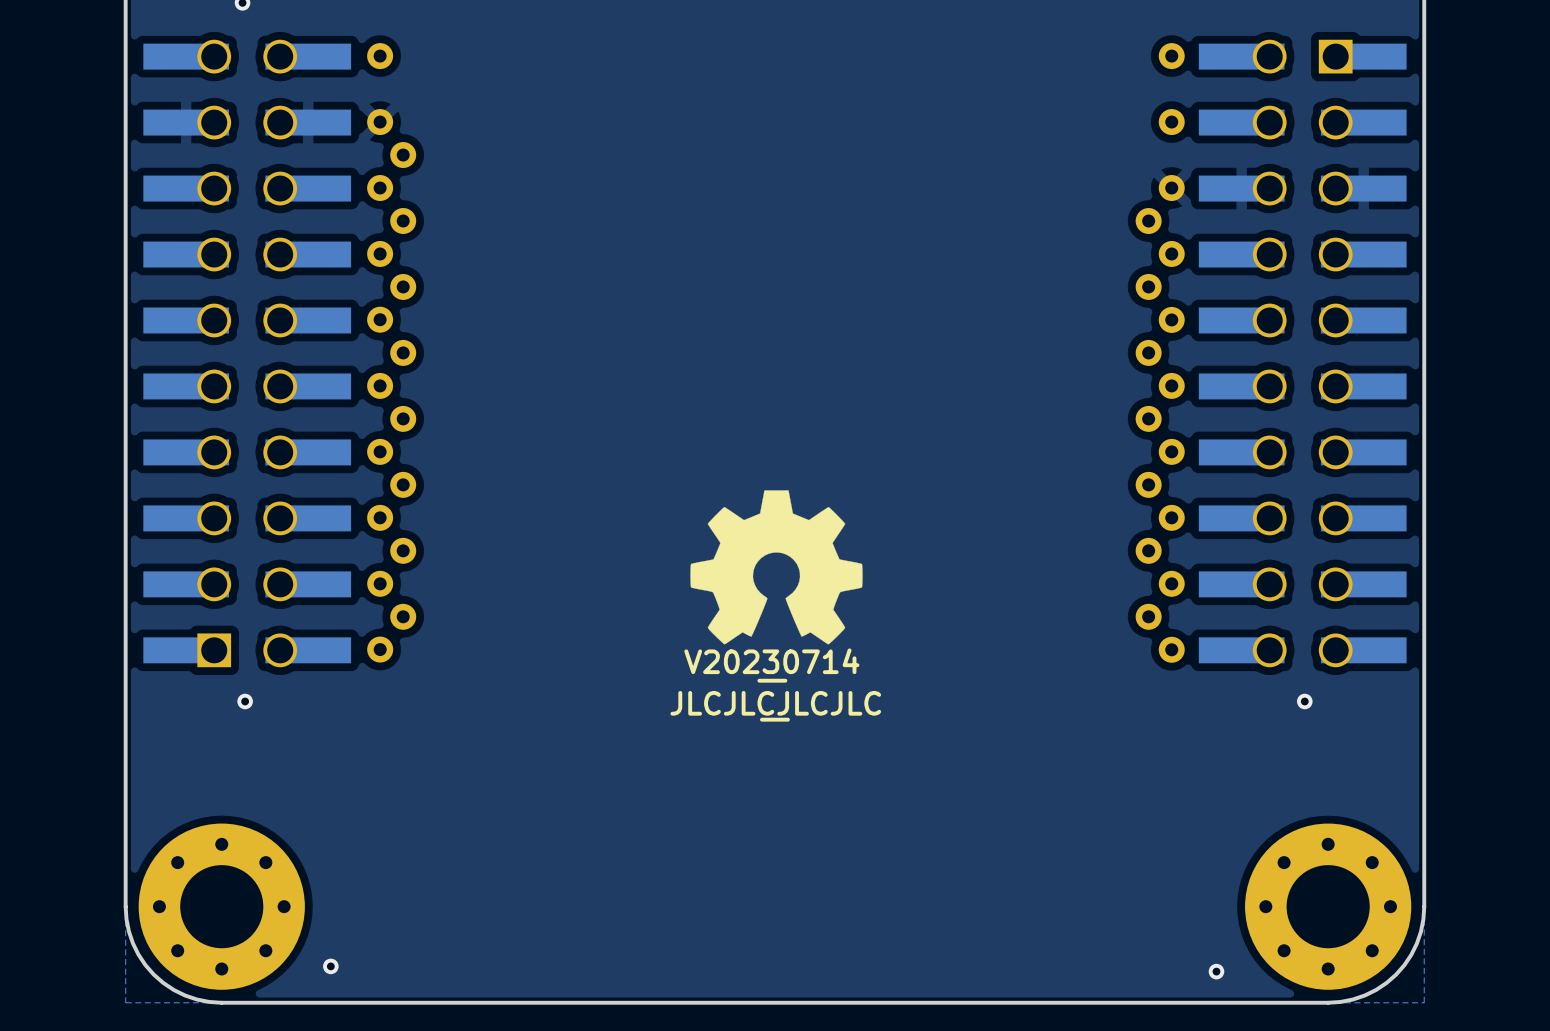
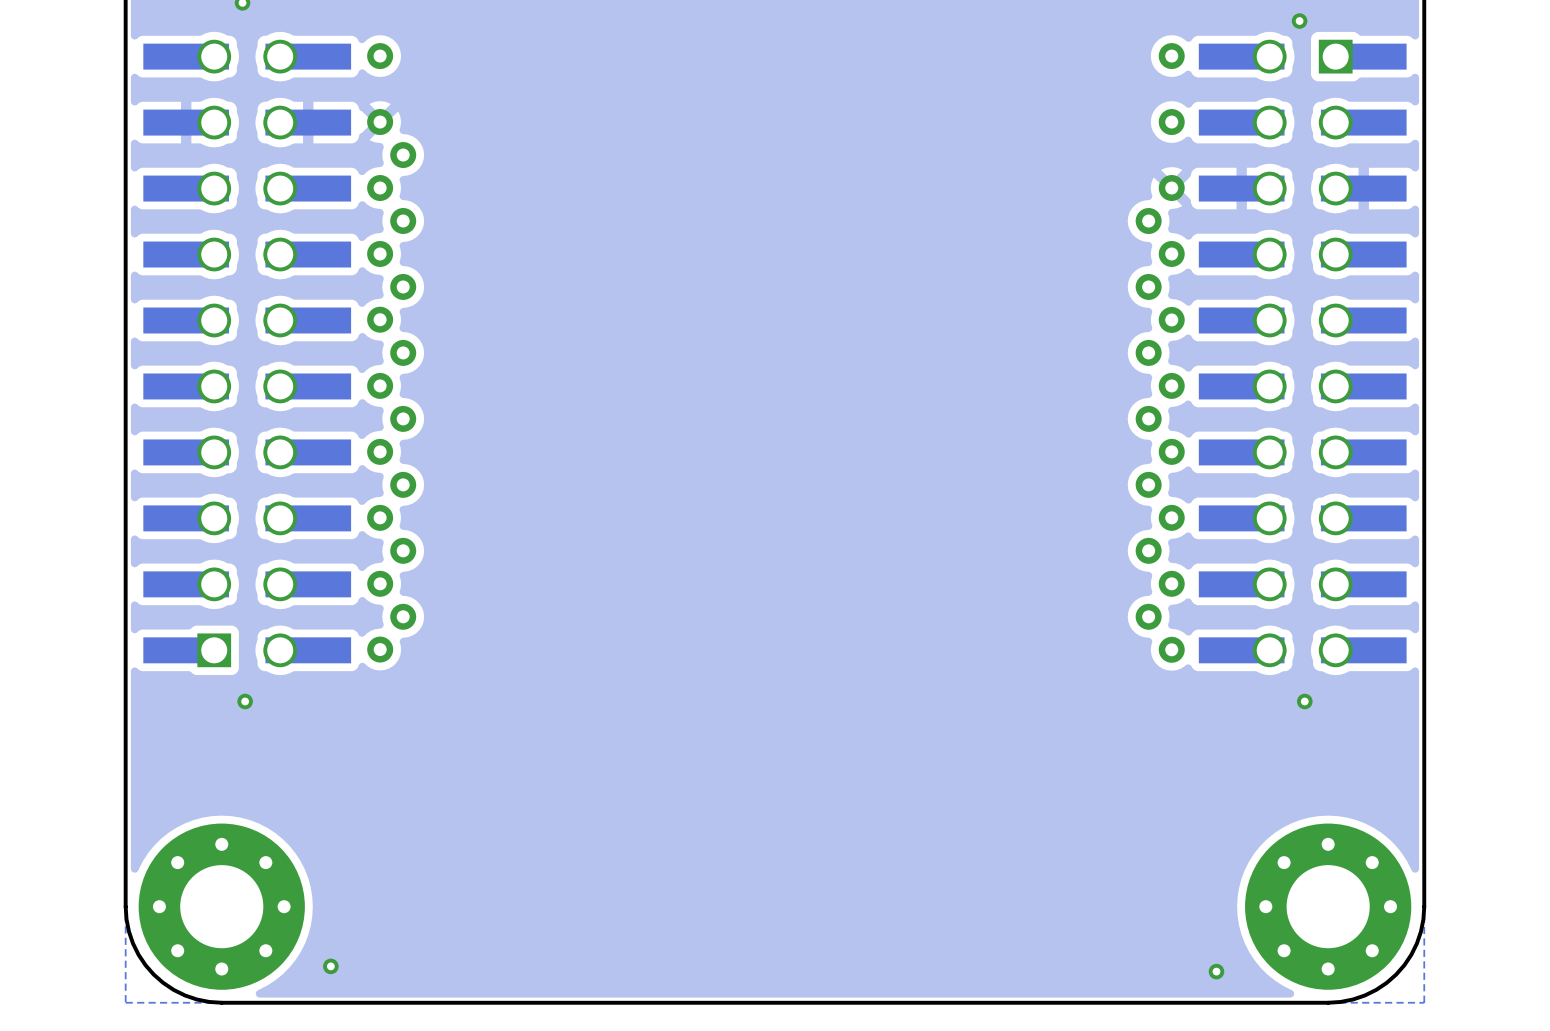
via: none -> (1299, 21)
drawing: [690, 490, 863, 722] -> none

